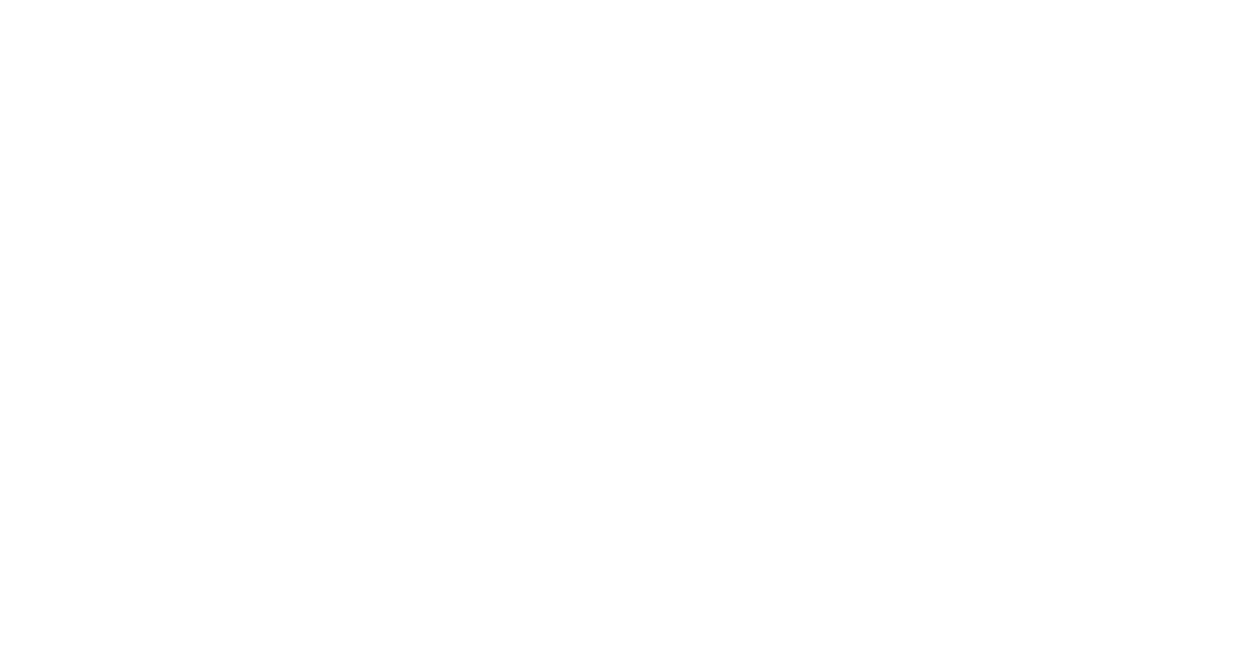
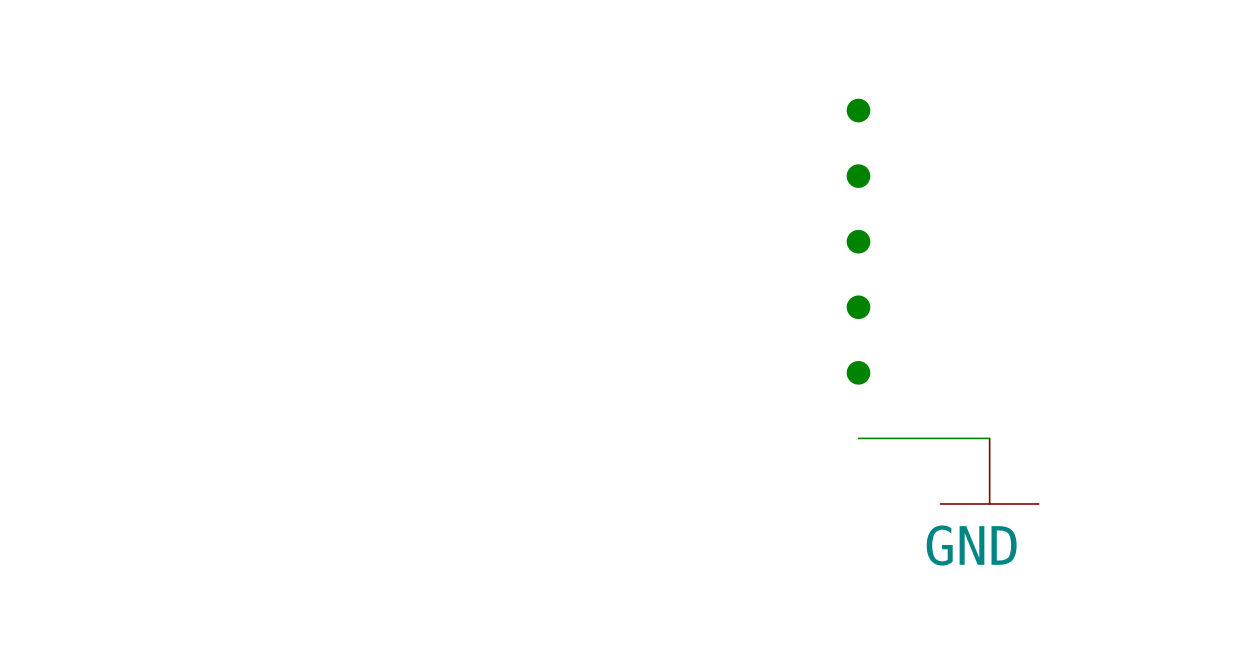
junction: none -> (858, 110)
junction: none -> (858, 176)
junction: none -> (858, 241)
junction: none -> (858, 307)
junction: none -> (858, 372)
wire: none -> (858, 438) (989, 438)
power symbol: none -> GND (989, 471)

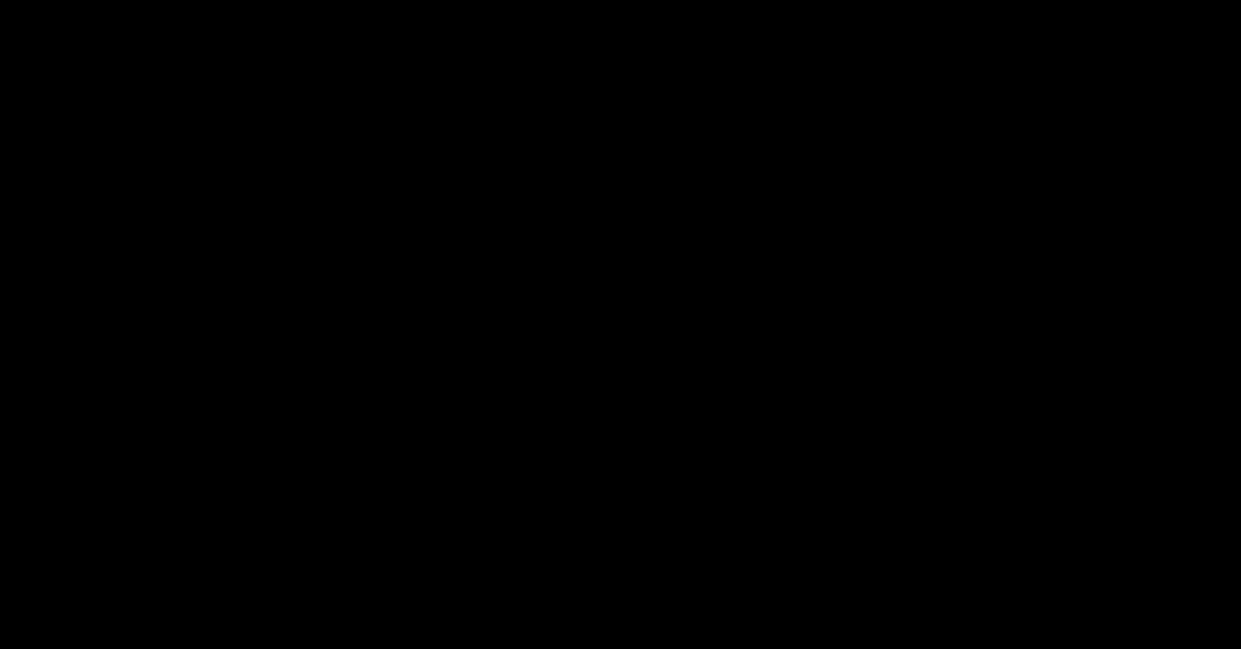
junction: (858, 110) -> none
junction: (858, 176) -> none
junction: (858, 241) -> none
junction: (858, 307) -> none
junction: (858, 372) -> none
wire: (858, 438) (989, 438) -> none
power symbol: GND (989, 471) -> none

